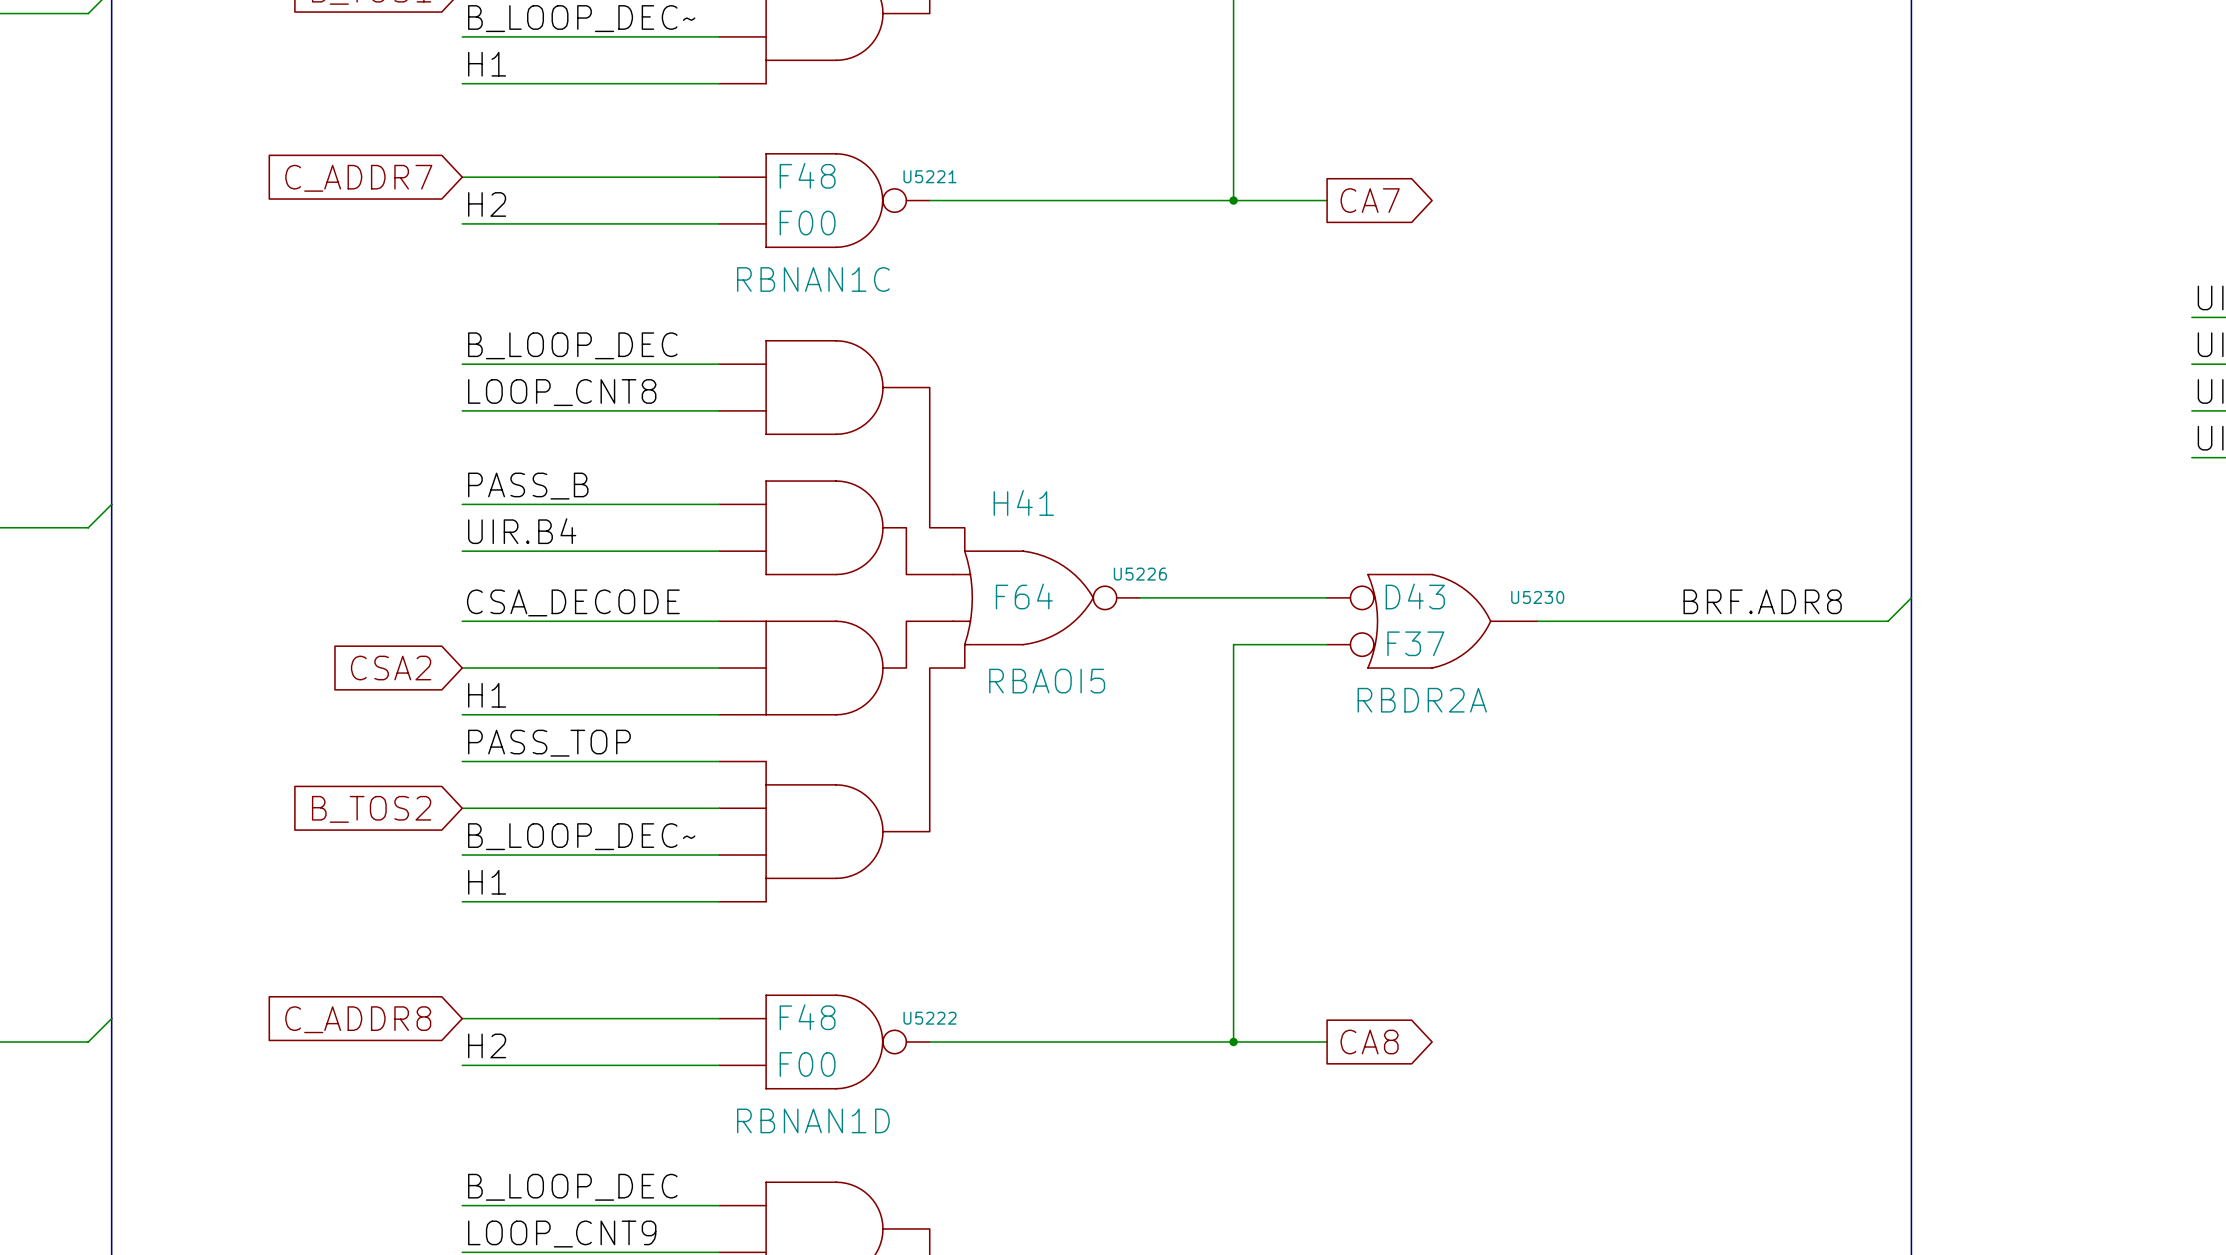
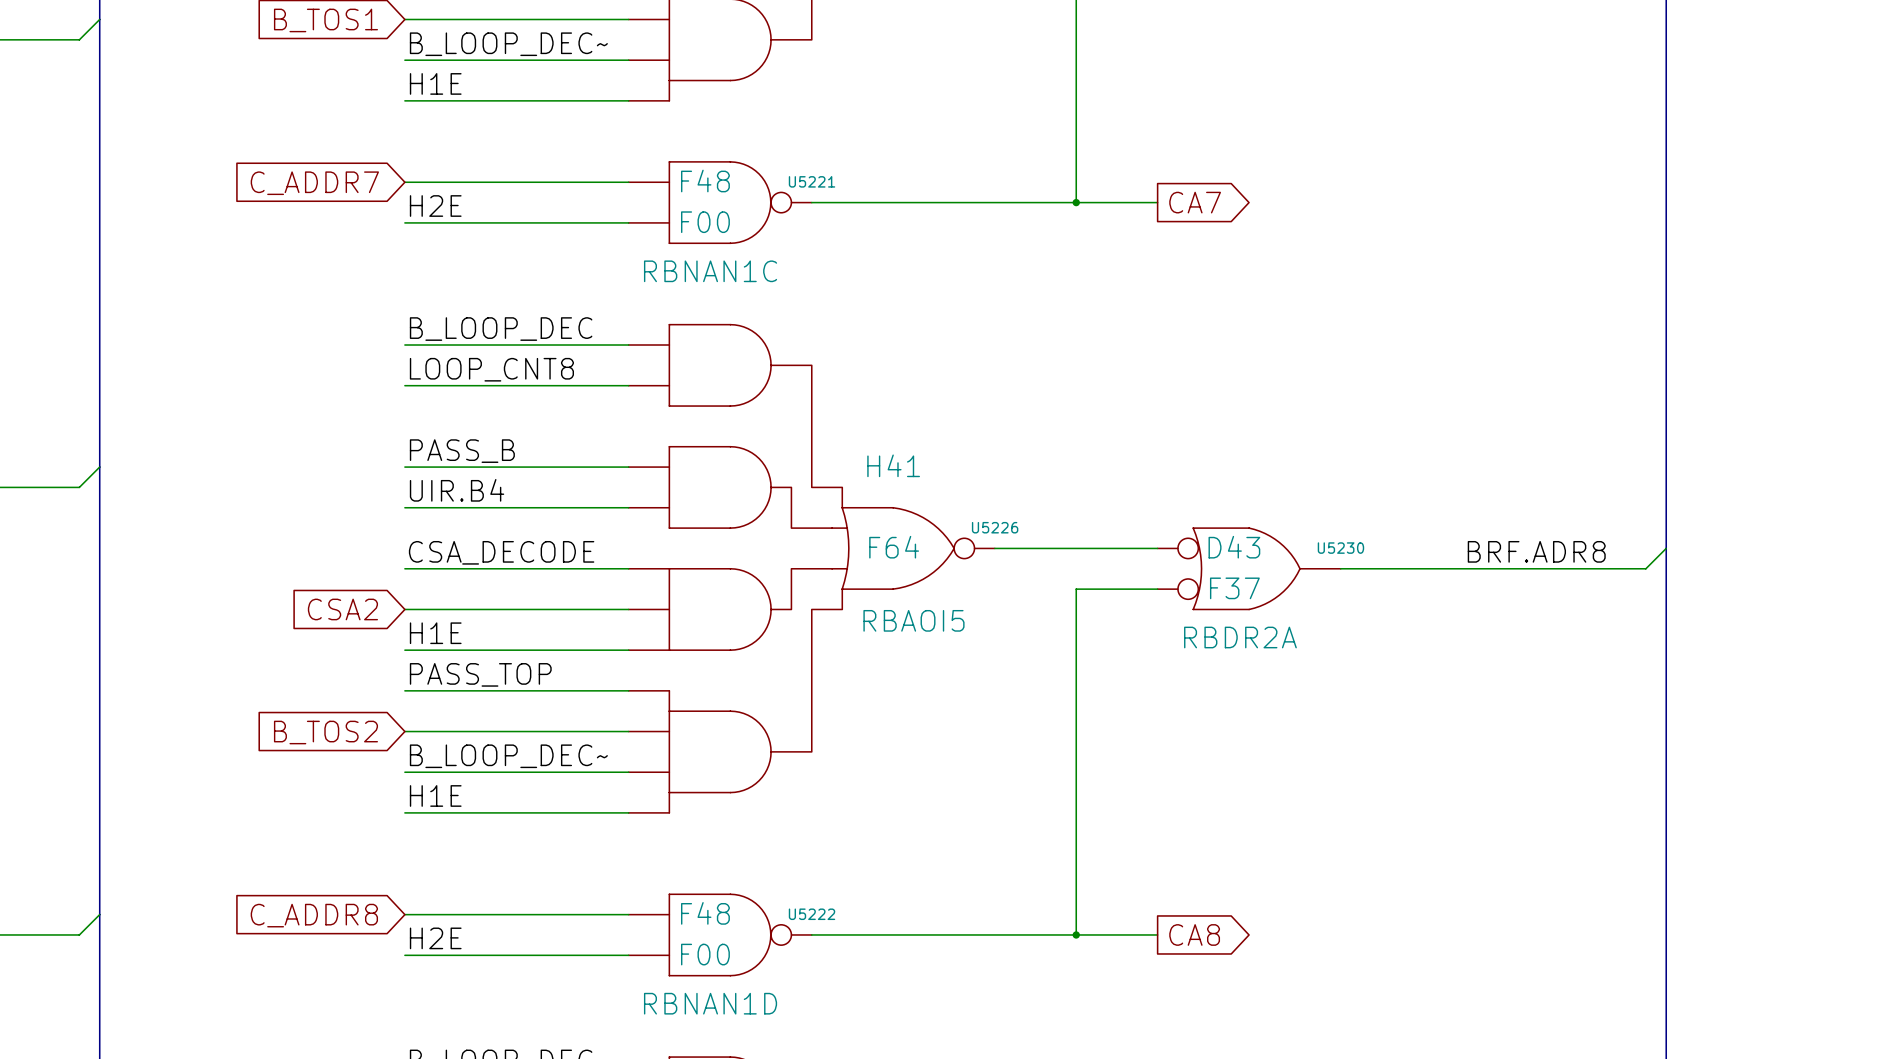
label: H1 (487, 64) -> H1E (435, 83)
label: H2 (487, 204) -> H2E (435, 206)
label: H1 (487, 695) -> H1E (435, 633)
label: H1 (487, 882) -> H1E (435, 795)
label: H2 (487, 1045) -> H2E (435, 938)

